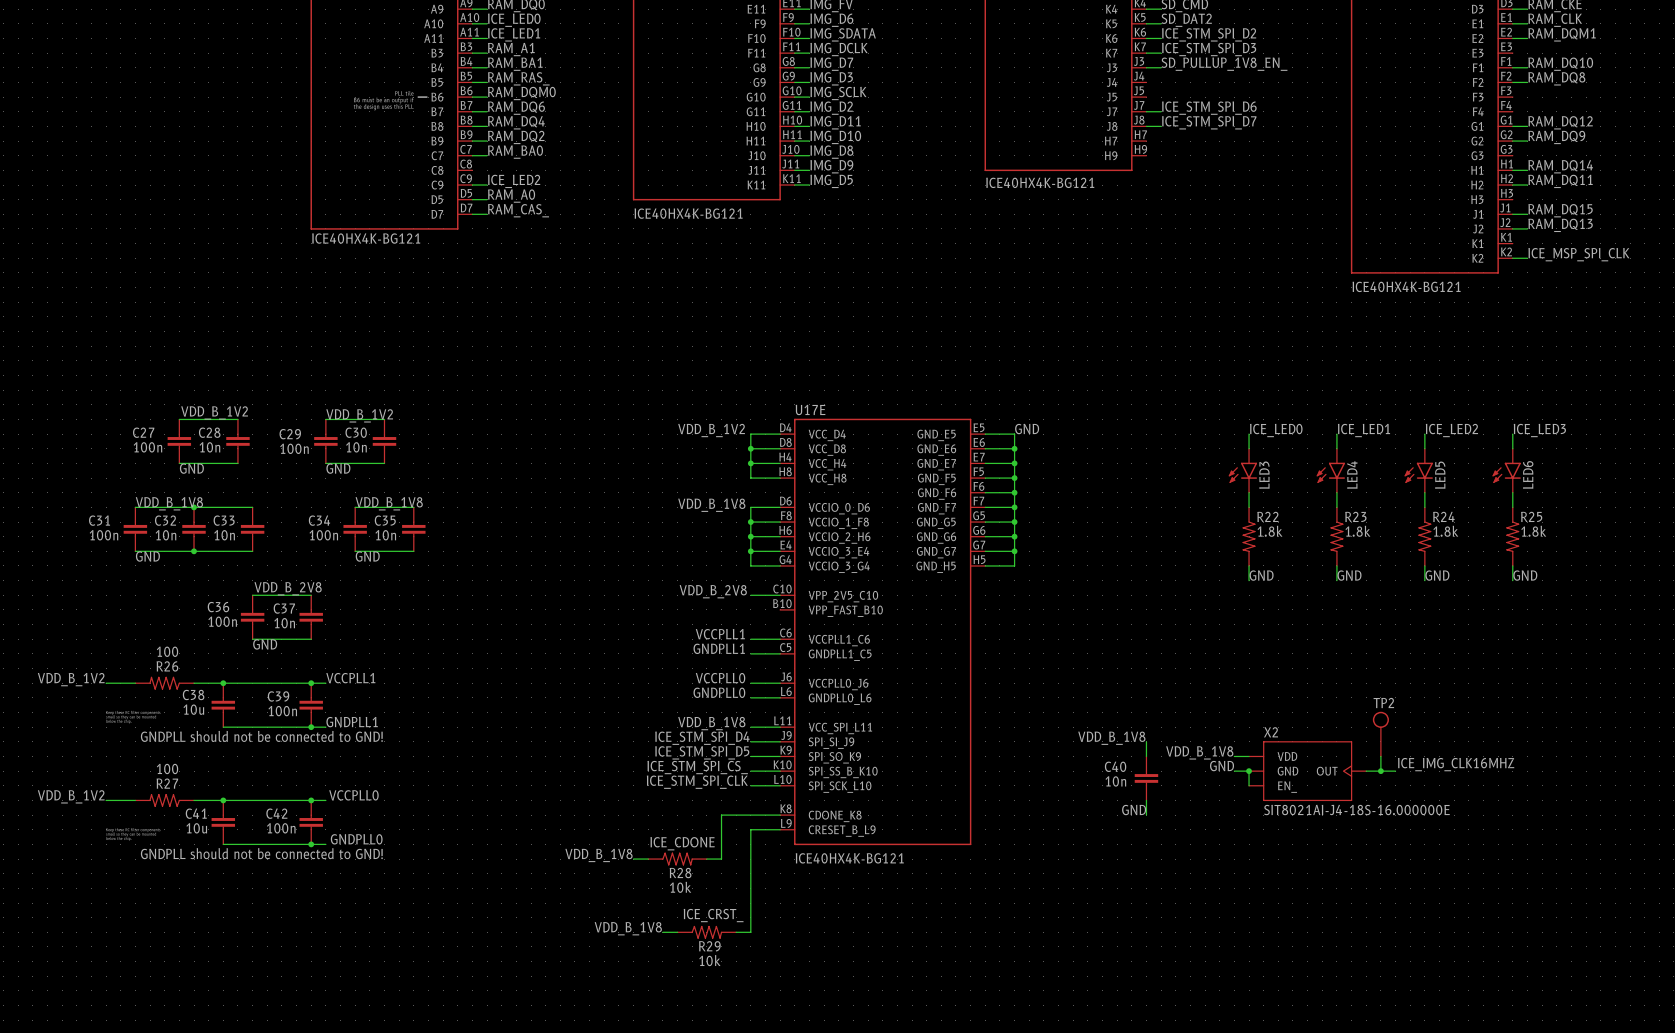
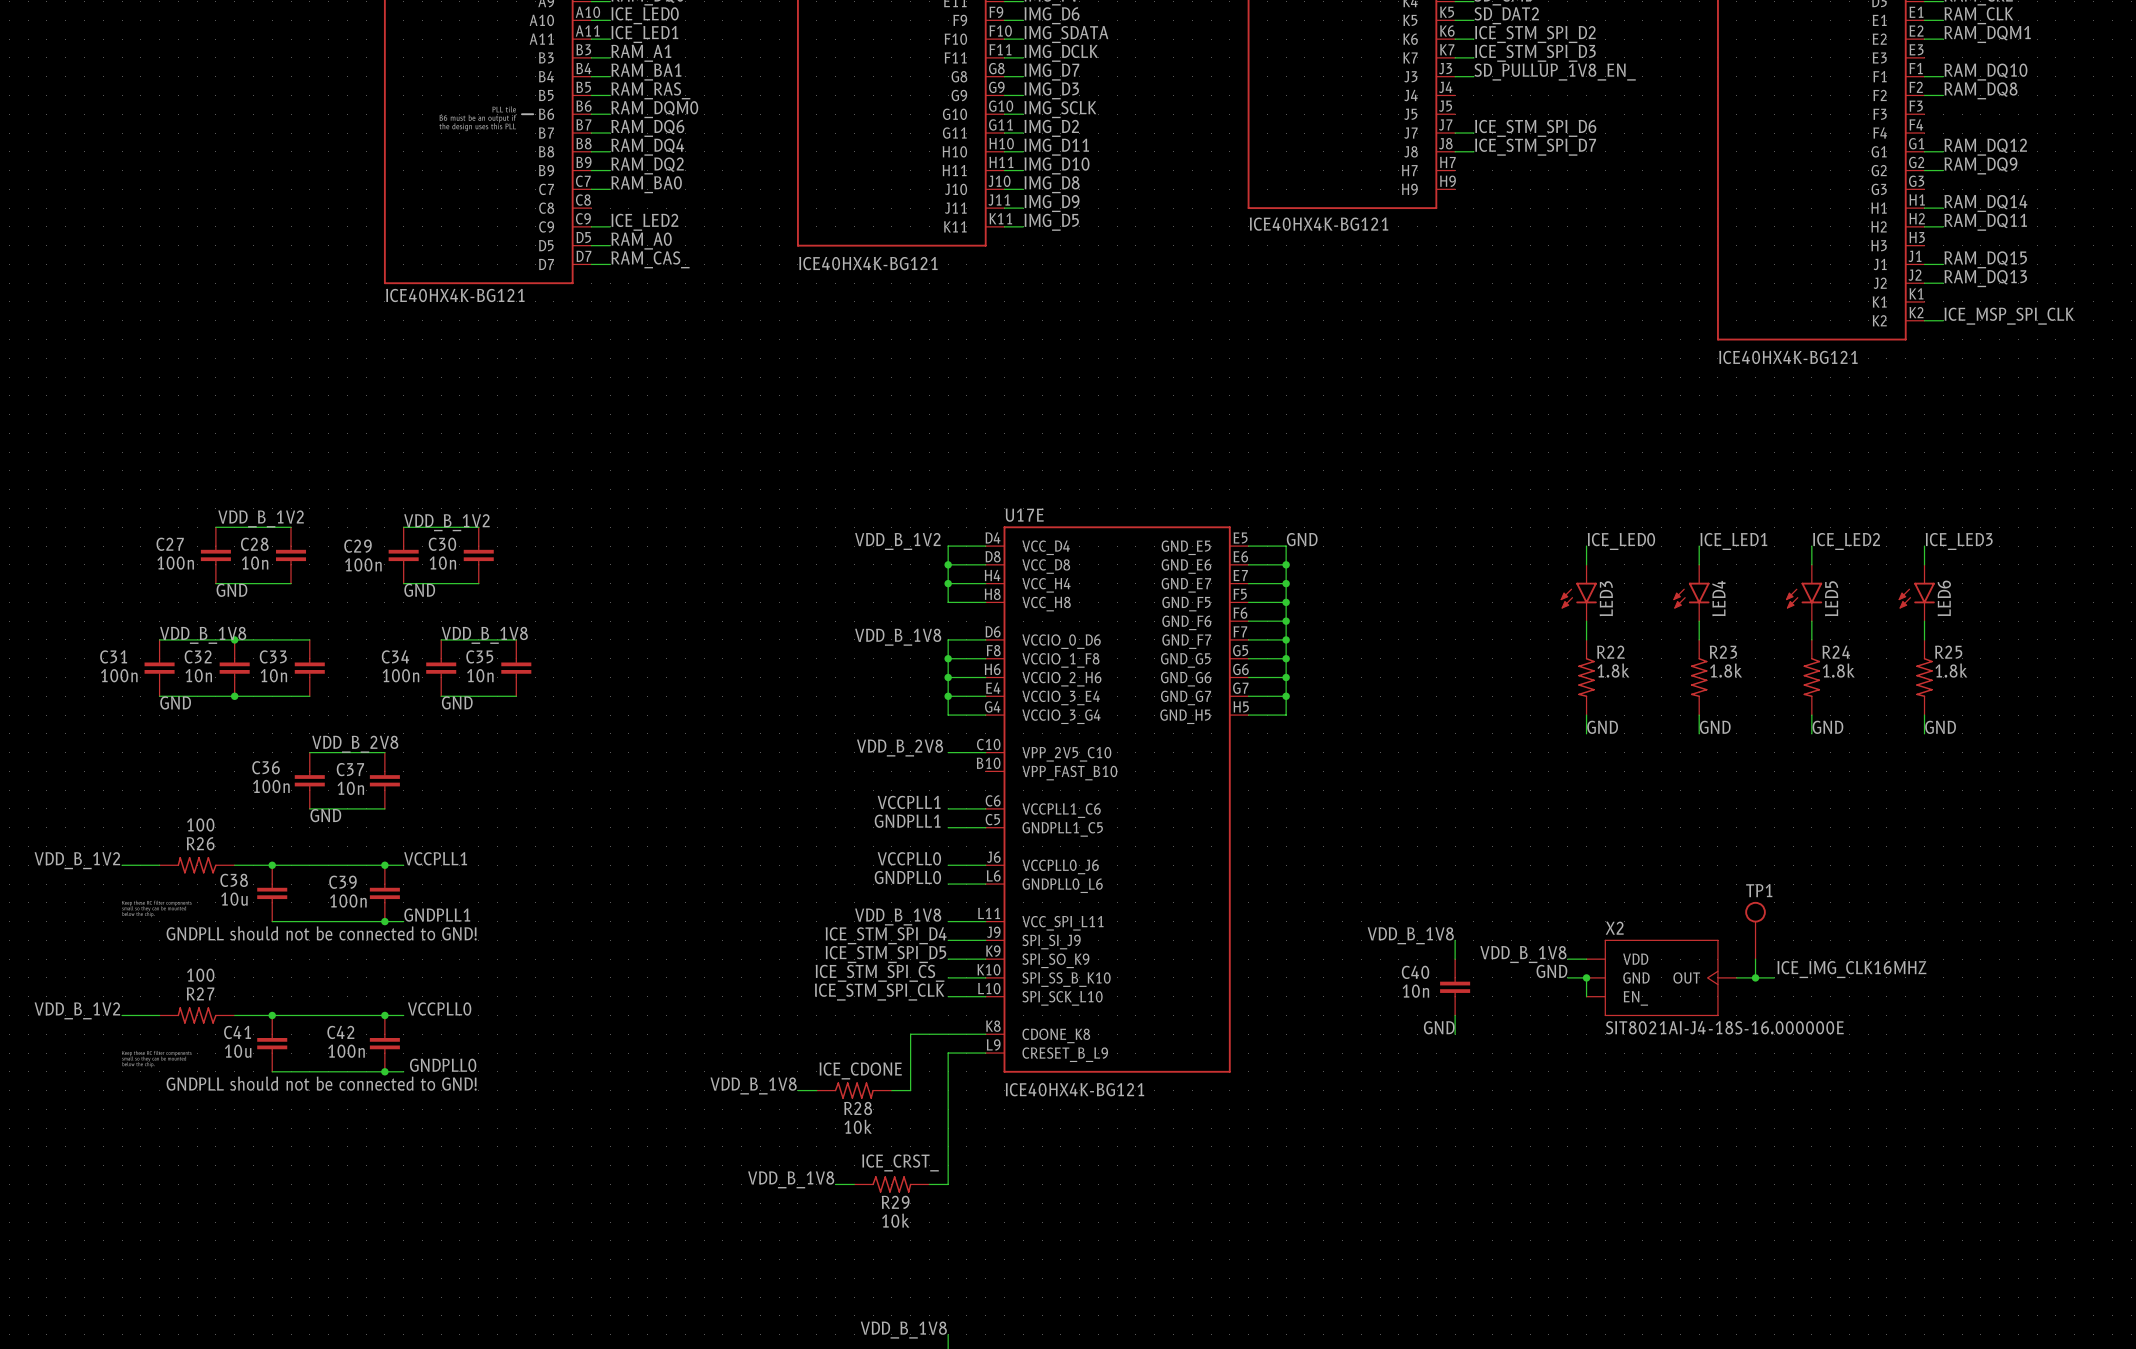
TP2 name: TP2 (1383, 703) -> TP1 (1759, 890)

